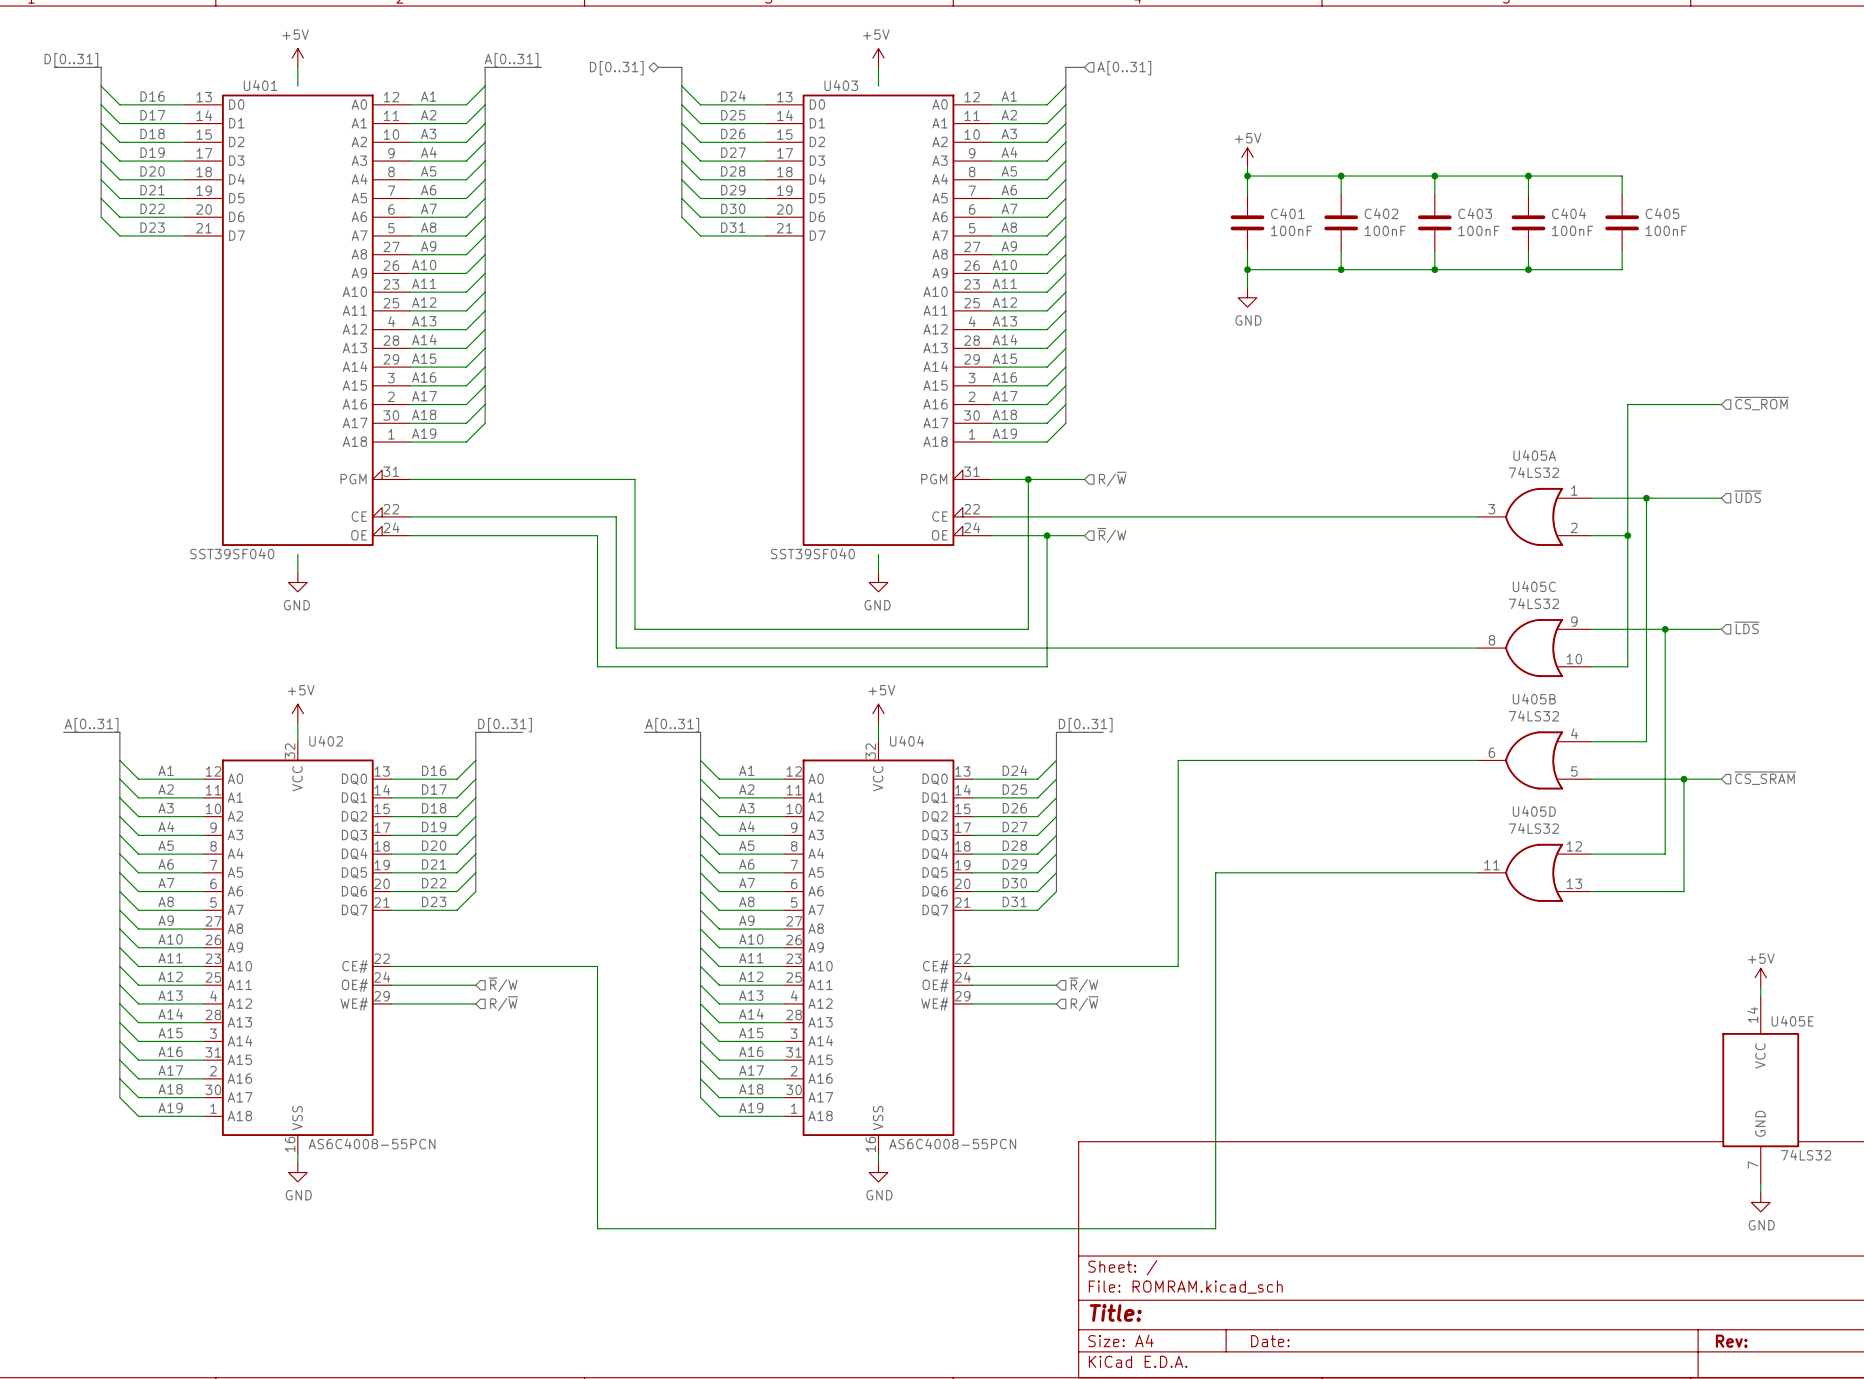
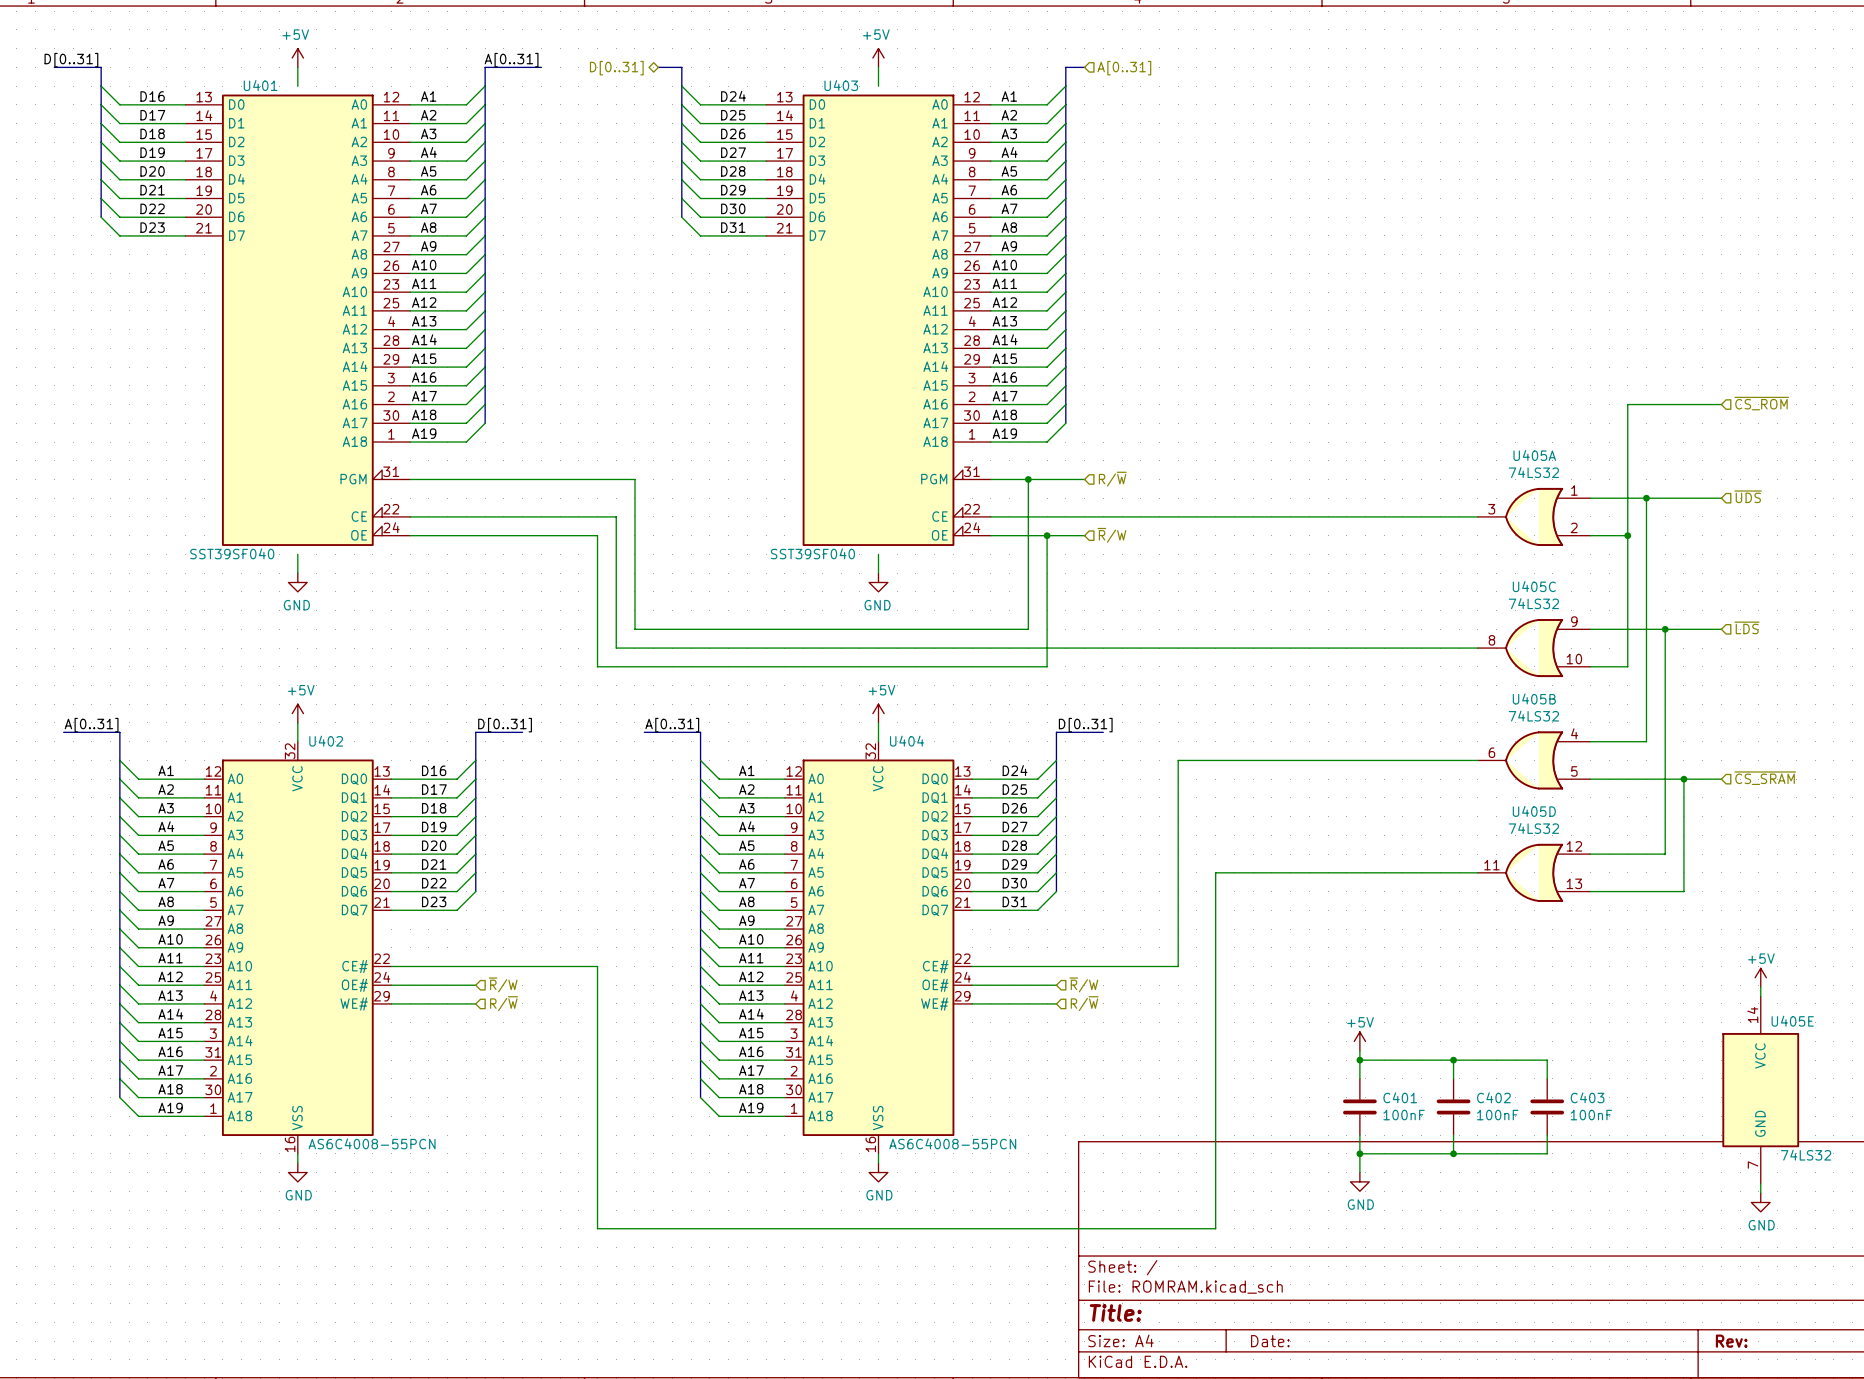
power symbol: +5V (1247, 157) -> none
wire: (1247, 166) (1247, 194) -> none
wire: (1247, 176) (1622, 176) (1622, 194) -> none
junction: (1247, 176) -> none
wire: (1341, 176) (1341, 194) -> none
junction: (1341, 176) -> none
wire: (1434, 176) (1434, 194) -> none
junction: (1434, 176) -> none
wire: (1528, 176) (1528, 194) -> none
junction: (1528, 176) -> none
C401 position: (1247, 222) -> (1359, 1106)
C402 position: (1341, 222) -> (1453, 1106)
C403 position: (1434, 222) -> (1547, 1106)
C404: 100nF (1528, 222) -> none
C405: 100nF (1622, 222) -> none
wire: (1247, 250) (1247, 288) -> none
wire: (1341, 250) (1341, 269) -> none
wire: (1434, 250) (1434, 269) -> none
wire: (1528, 250) (1528, 269) -> none
wire: (1622, 250) (1622, 269) (1247, 269) -> none
junction: (1247, 269) -> none
junction: (1341, 269) -> none
junction: (1434, 269) -> none
junction: (1528, 269) -> none
power symbol: GND (1247, 297) -> none
power symbol: none -> +5V (1359, 1041)
wire: none -> (1359, 1050) (1359, 1078)
wire: none -> (1359, 1060) (1547, 1060) (1547, 1078)
junction: none -> (1359, 1060)
wire: none -> (1453, 1060) (1453, 1078)
junction: none -> (1453, 1060)
wire: none -> (1359, 1135) (1359, 1172)
wire: none -> (1453, 1135) (1453, 1153)
wire: none -> (1547, 1135) (1547, 1153) (1359, 1153)
junction: none -> (1359, 1153)
junction: none -> (1453, 1153)
power symbol: none -> GND (1359, 1181)

